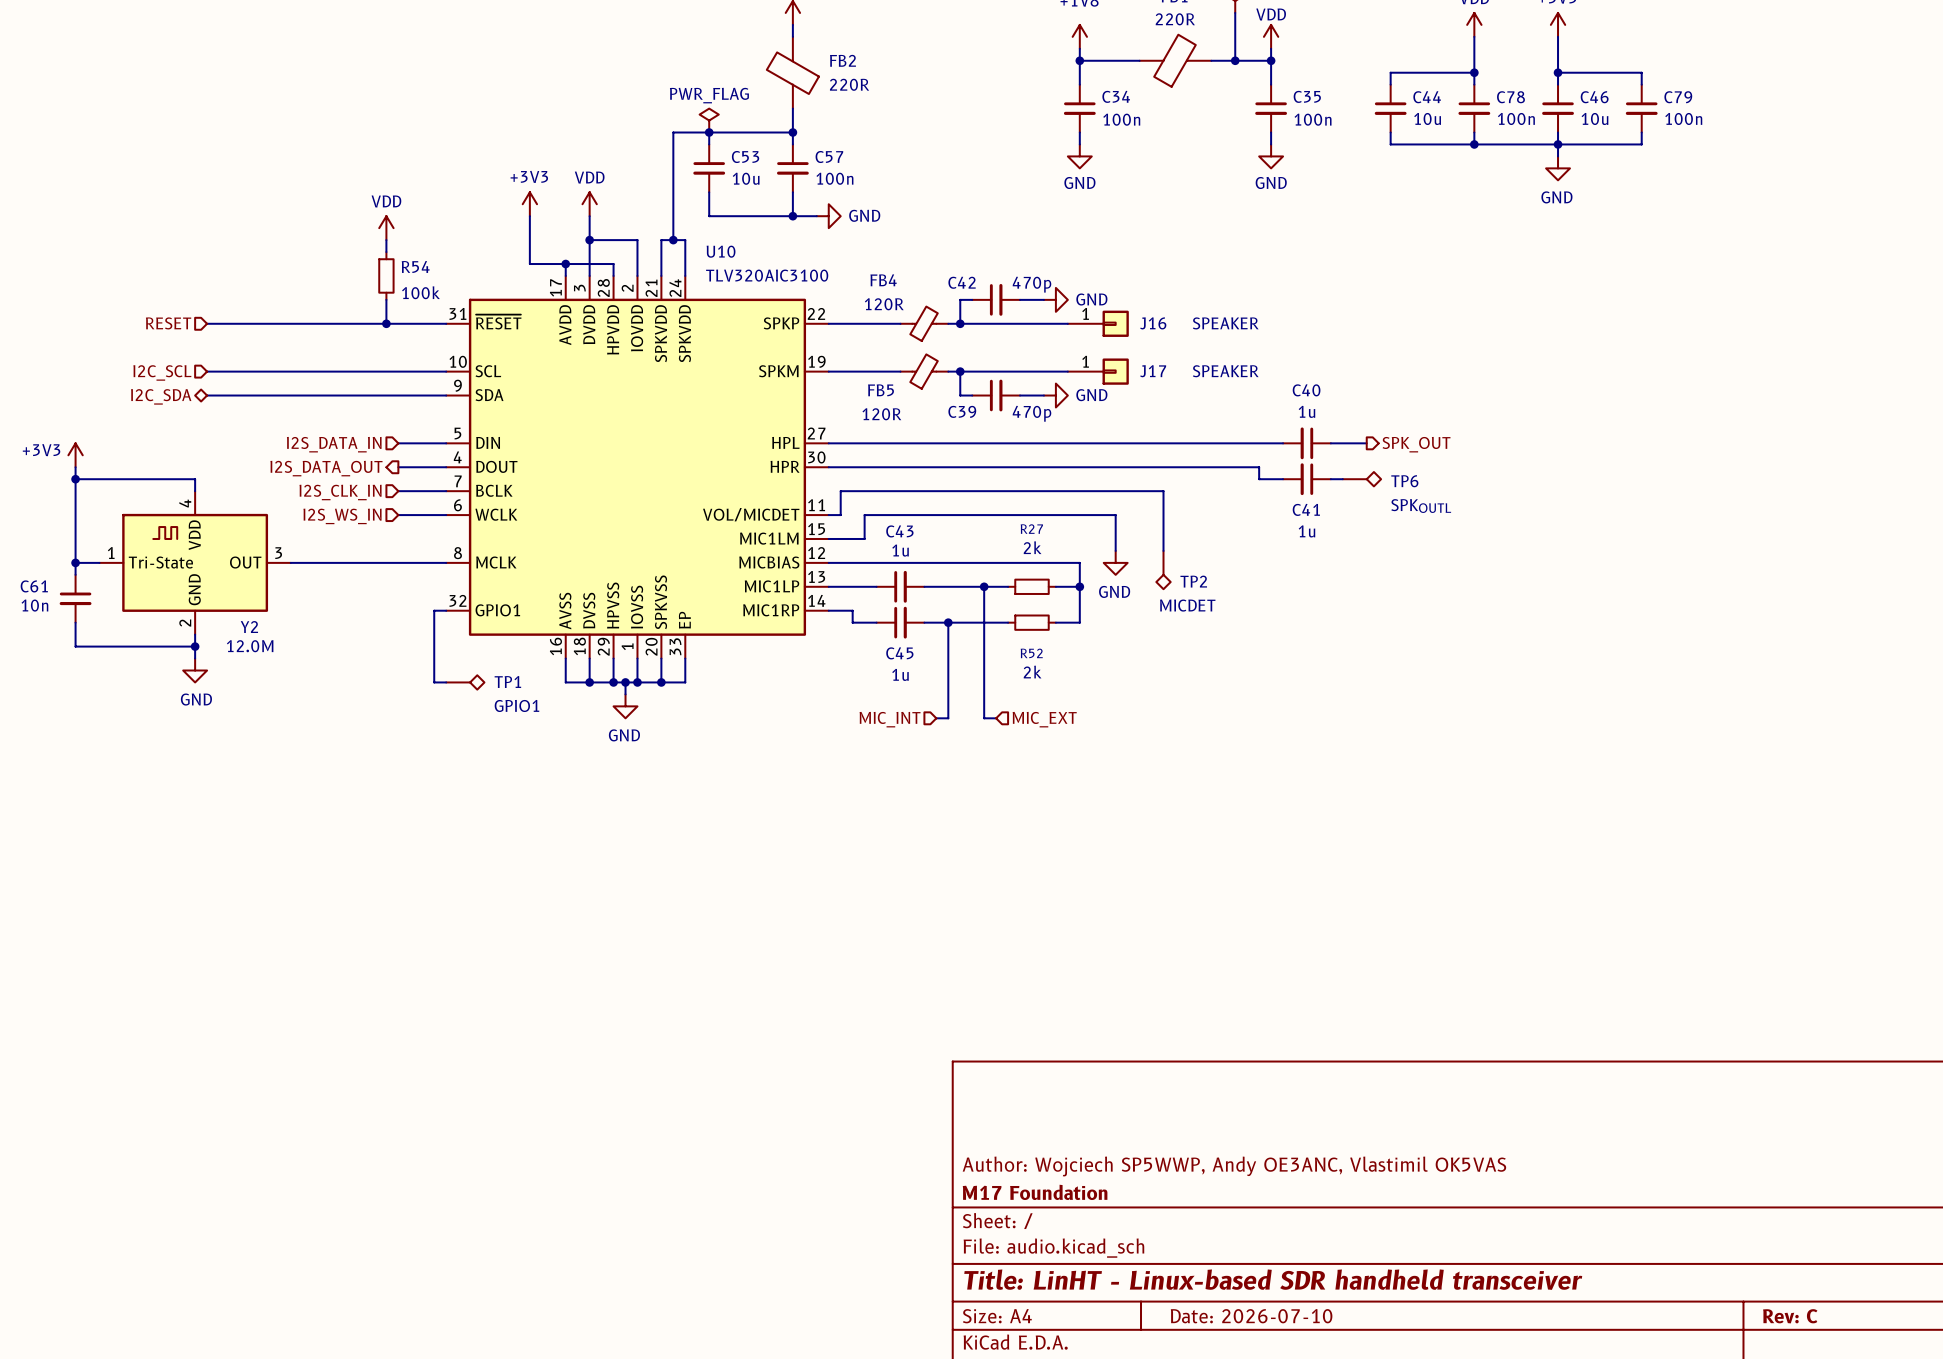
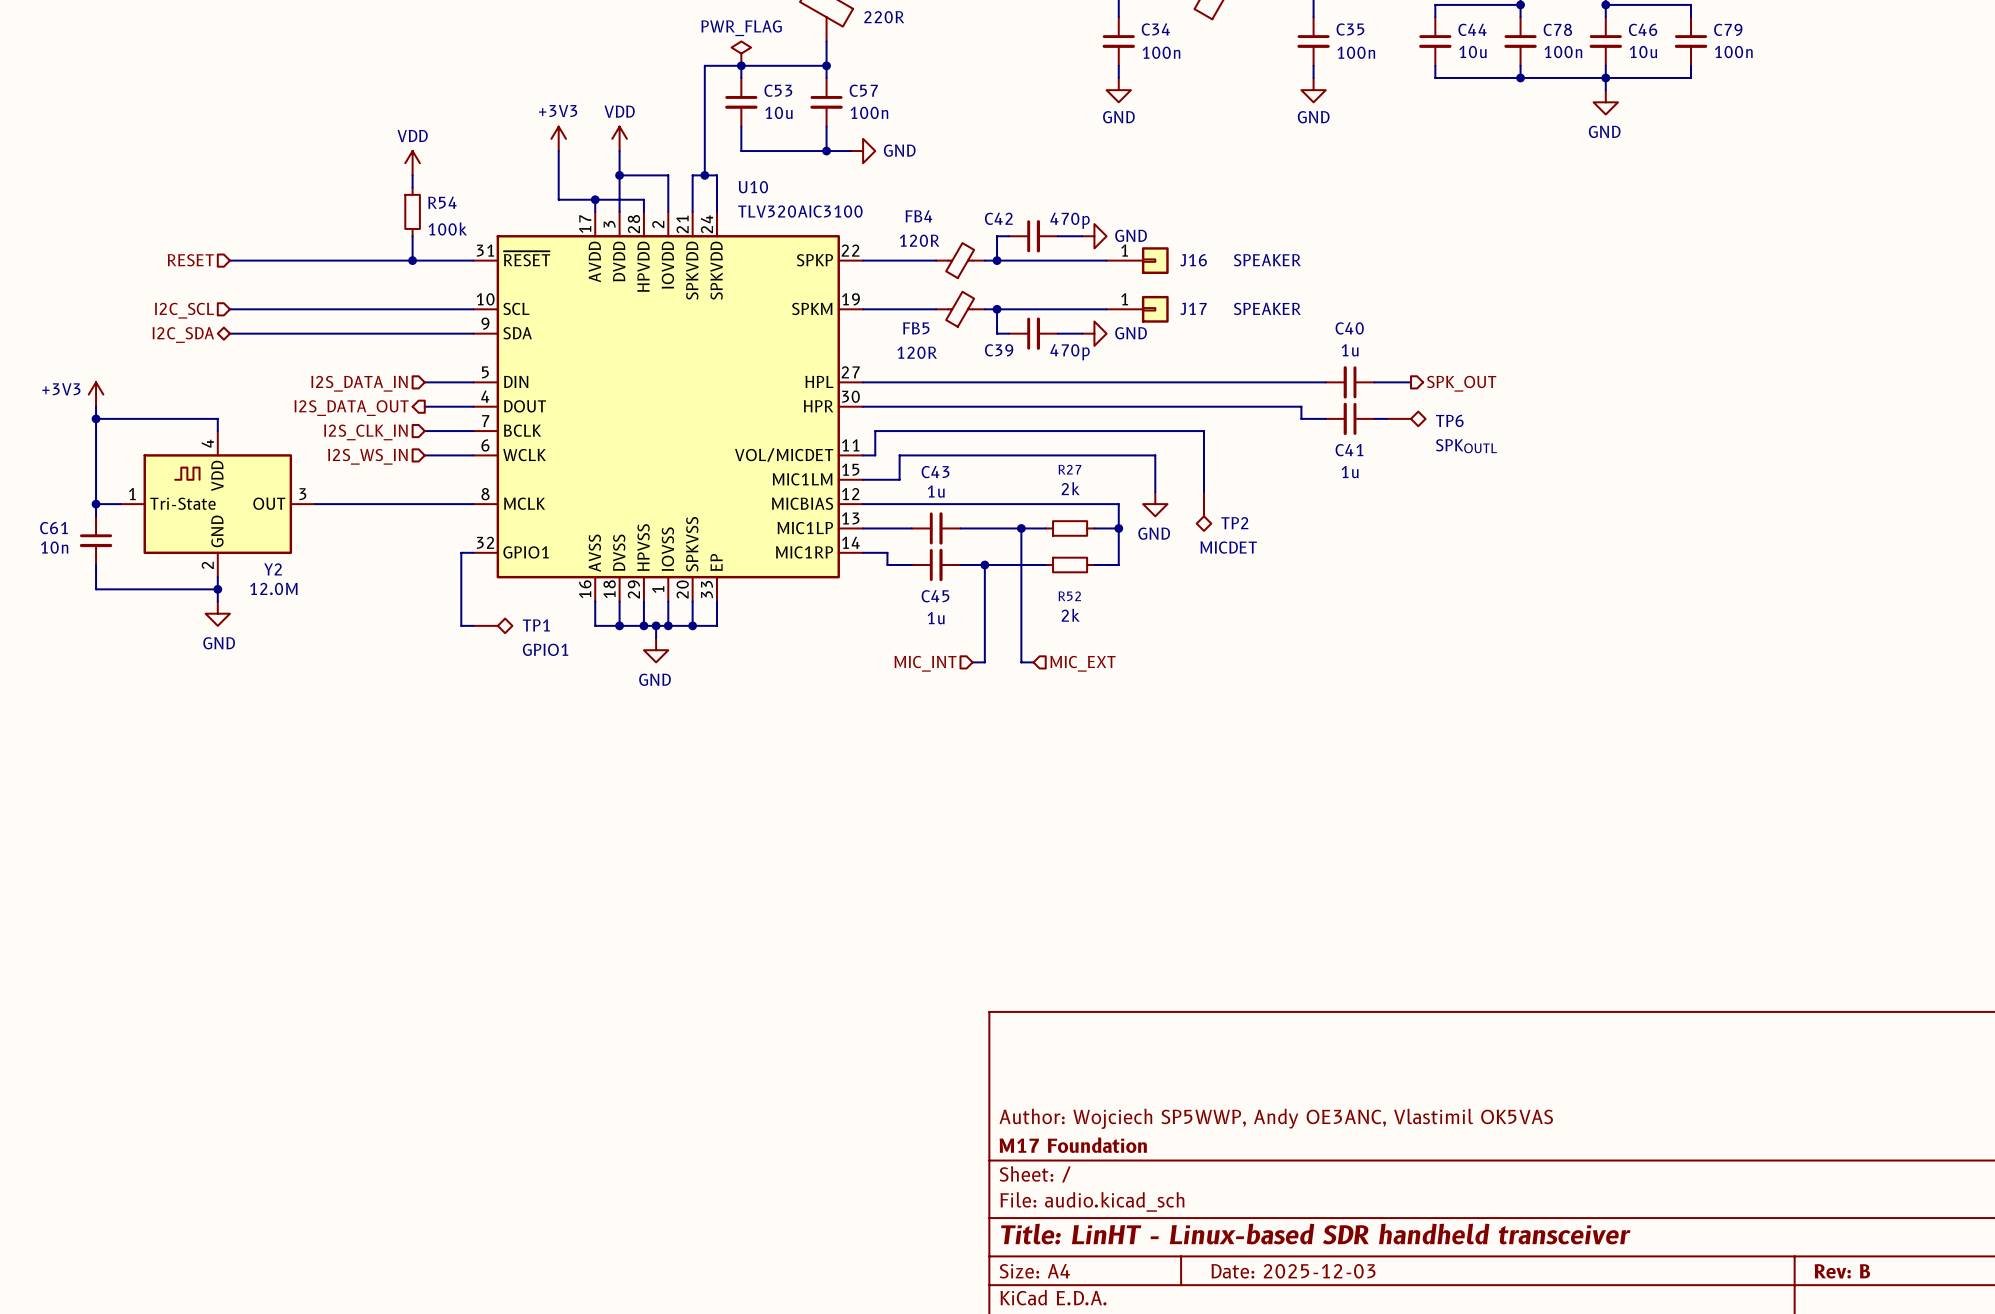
title block: Date: 2026-07-10 (1251, 1316) -> Date: 2025-12-03 (1293, 1271)
title block: Rev: C (1790, 1316) -> Rev: B (1842, 1271)

